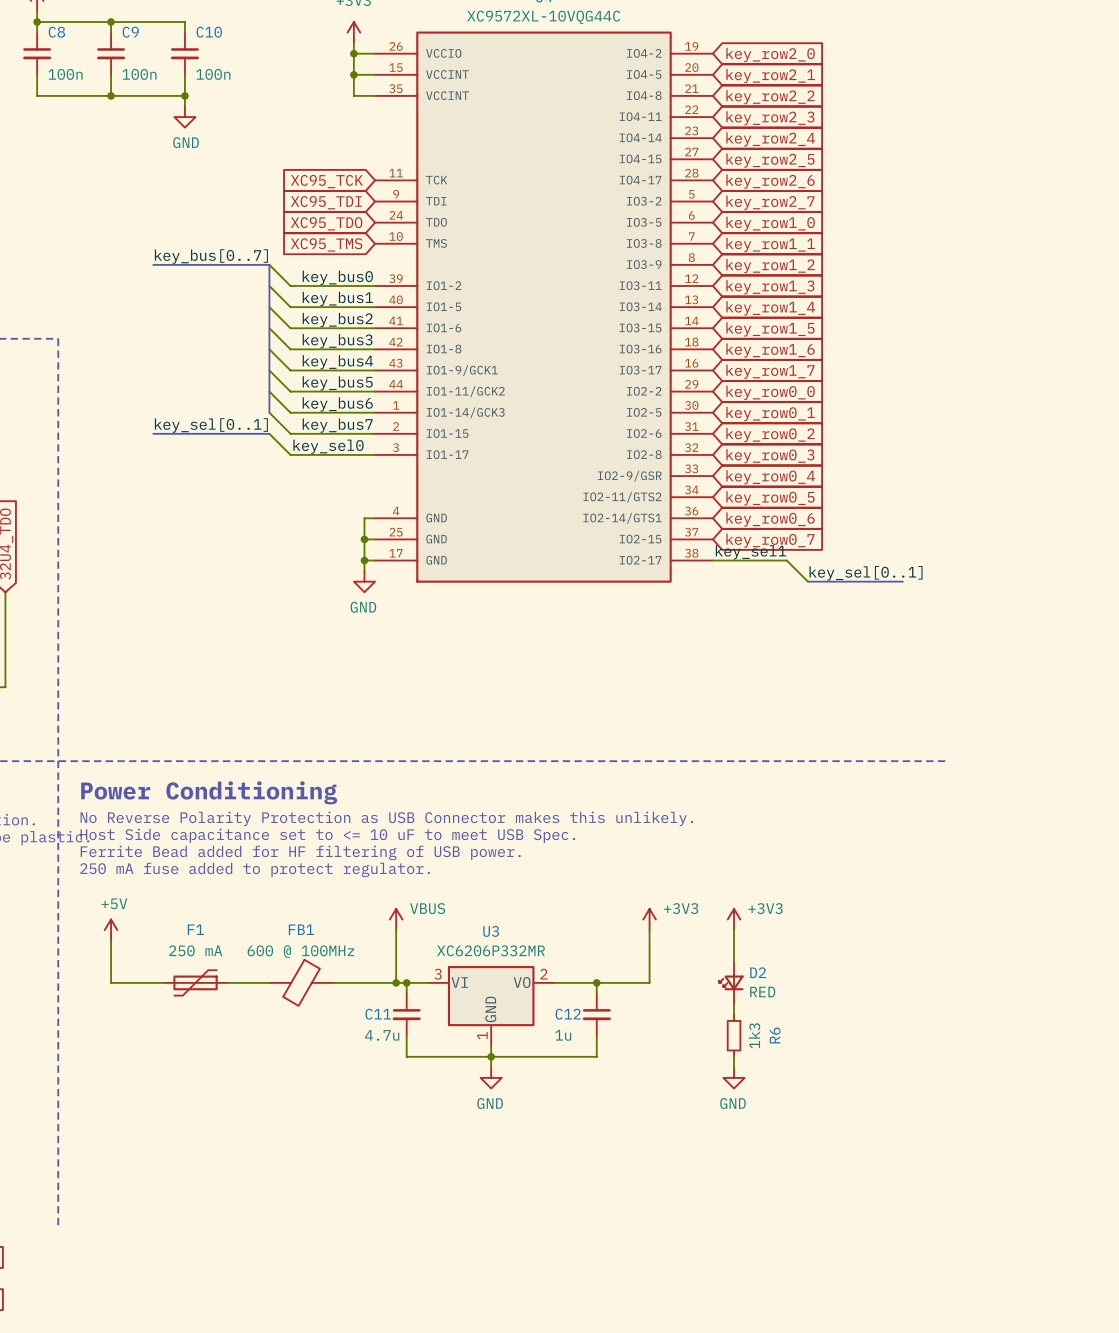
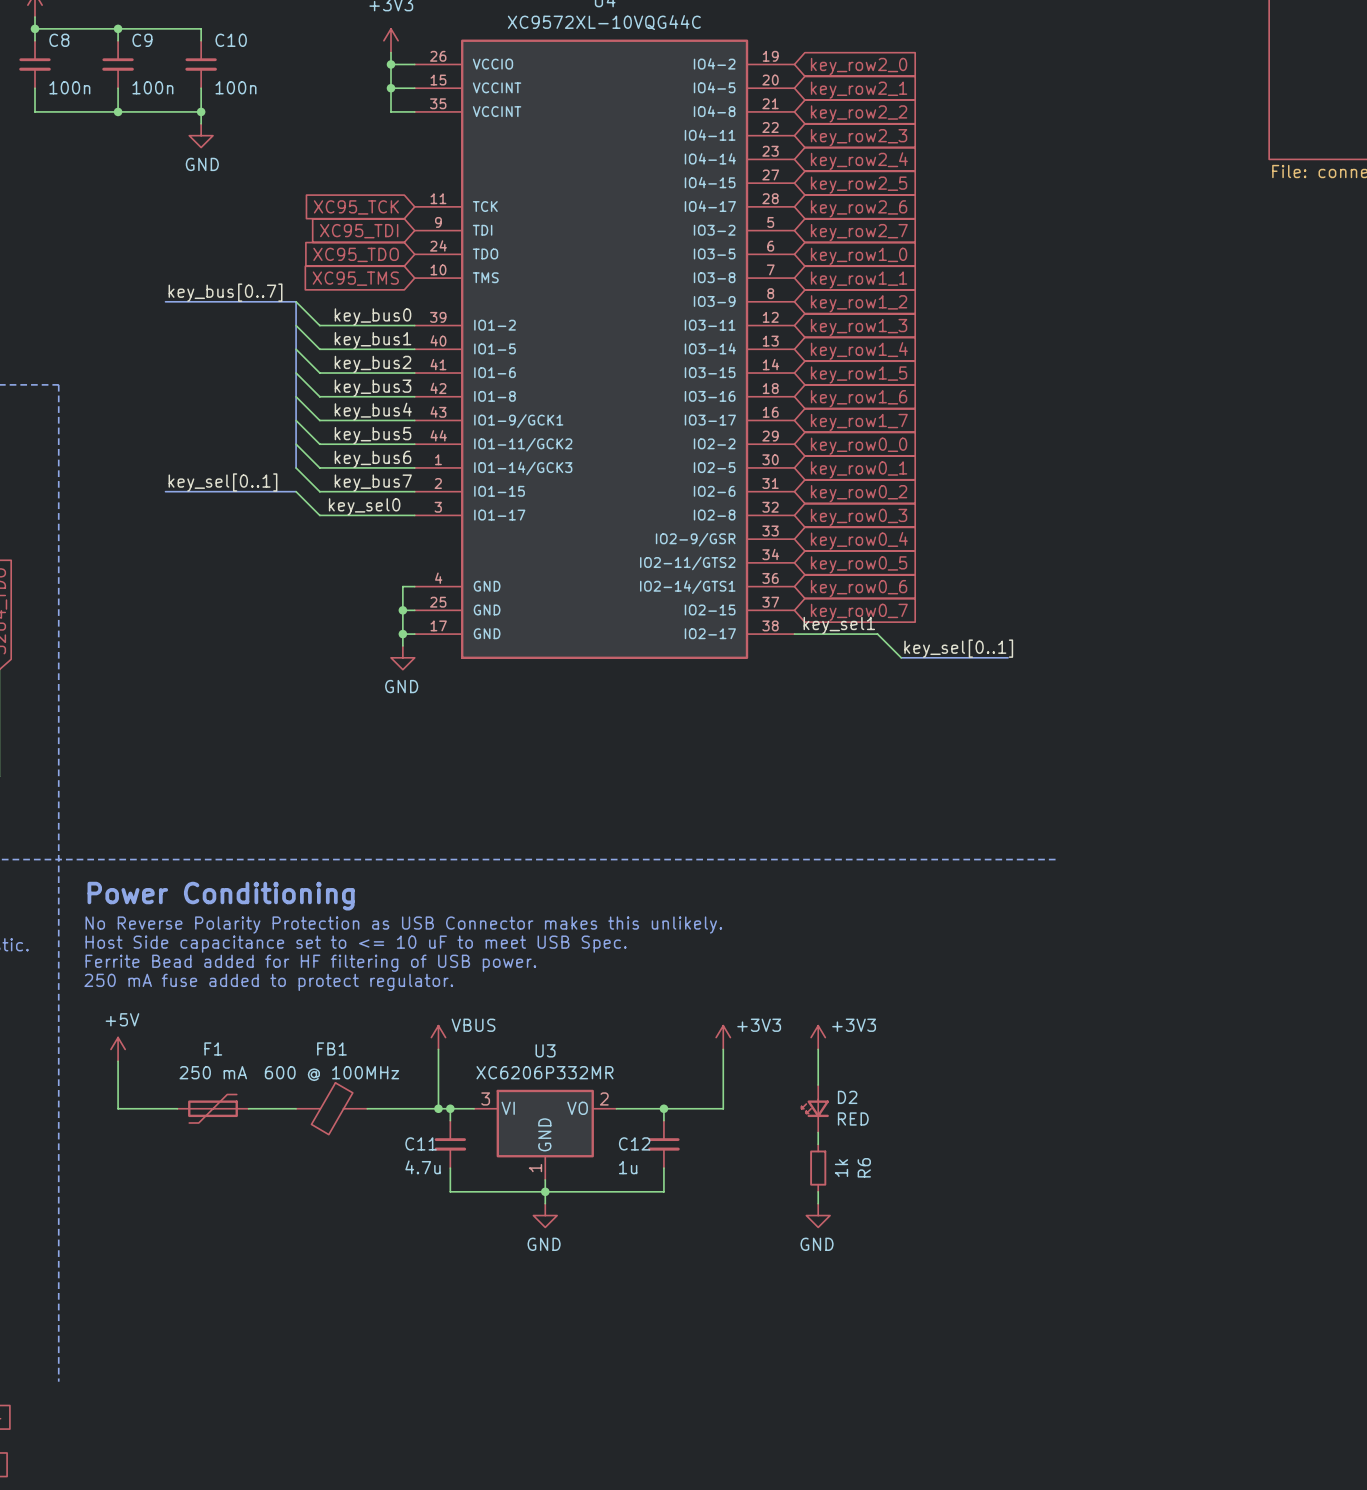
R6 value: 1k3 (754, 1035) -> 1k (841, 1168)

